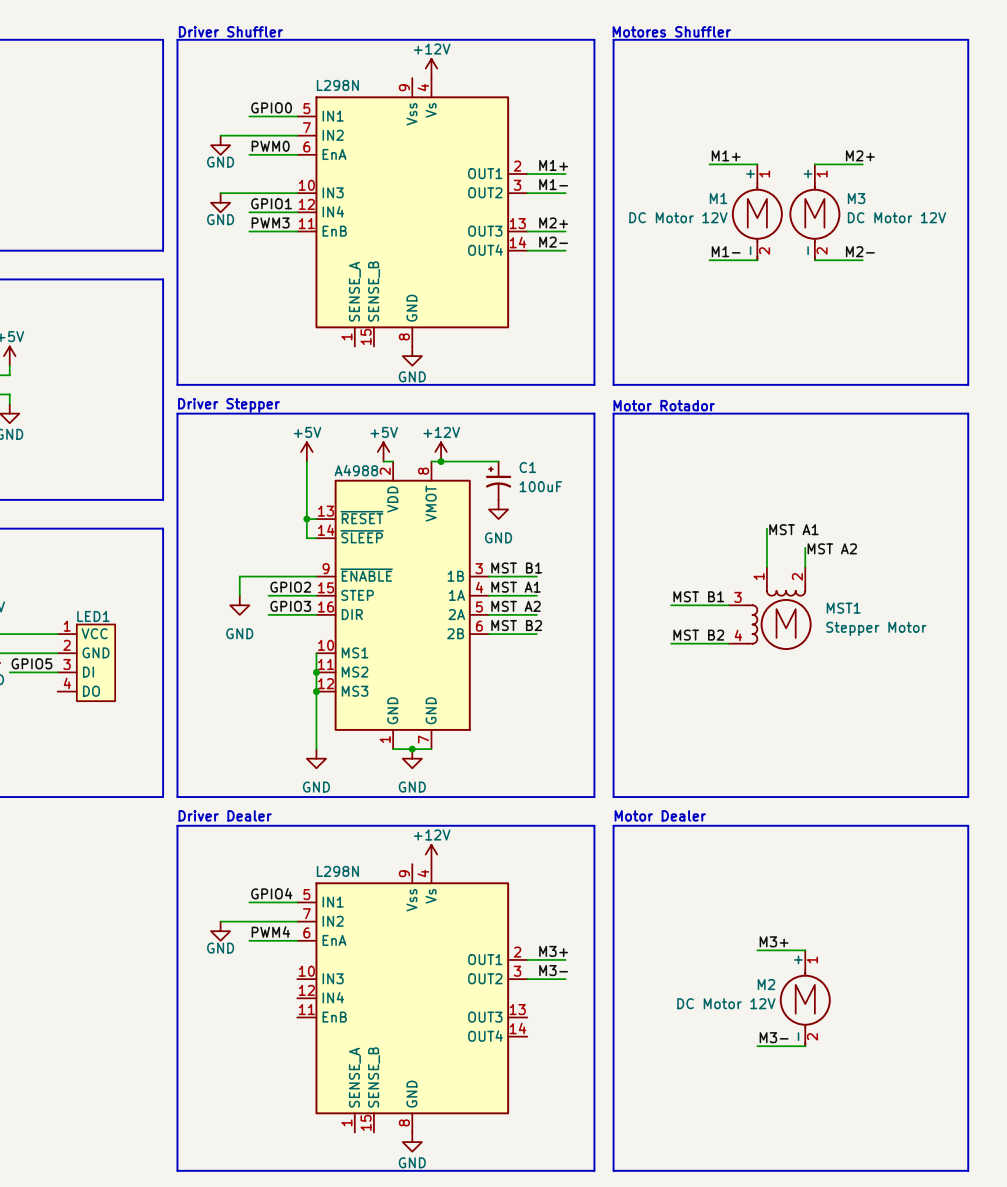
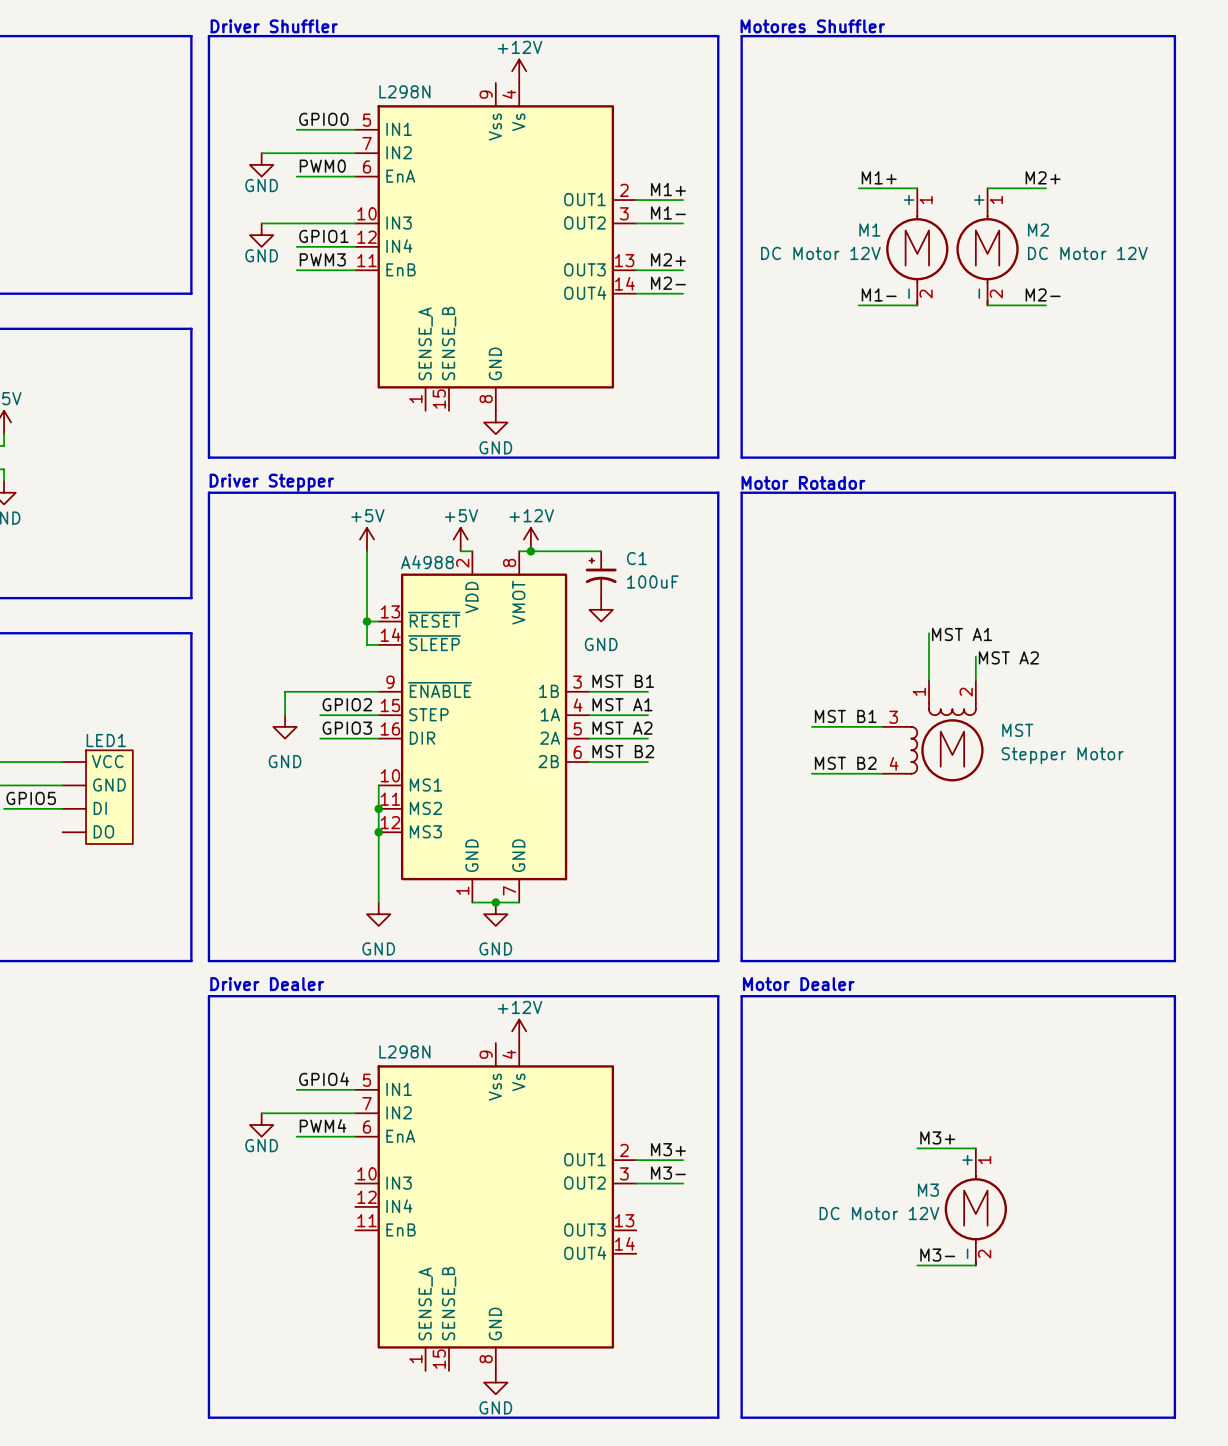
M3 name: M3 (856, 198) -> M2 (1038, 230)
MST1 name: MST1 (843, 608) -> MST (1017, 730)
LED1 pin number: 1 (67, 626) -> none
LED1 pin number: 2 (67, 645) -> none
LED1 pin number: 3 (67, 664) -> none
LED1 pin number: 4 (67, 683) -> none
M2 name: M2 (766, 984) -> M3 (928, 1190)

